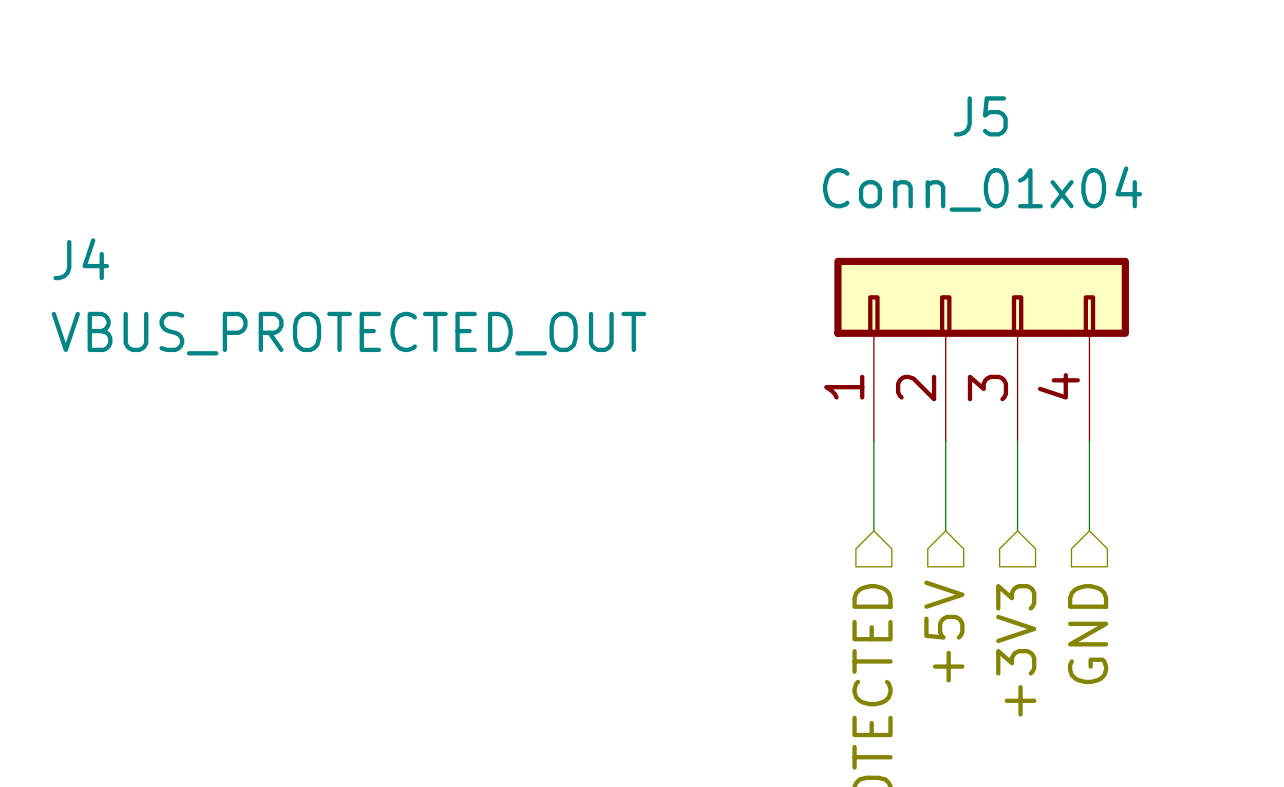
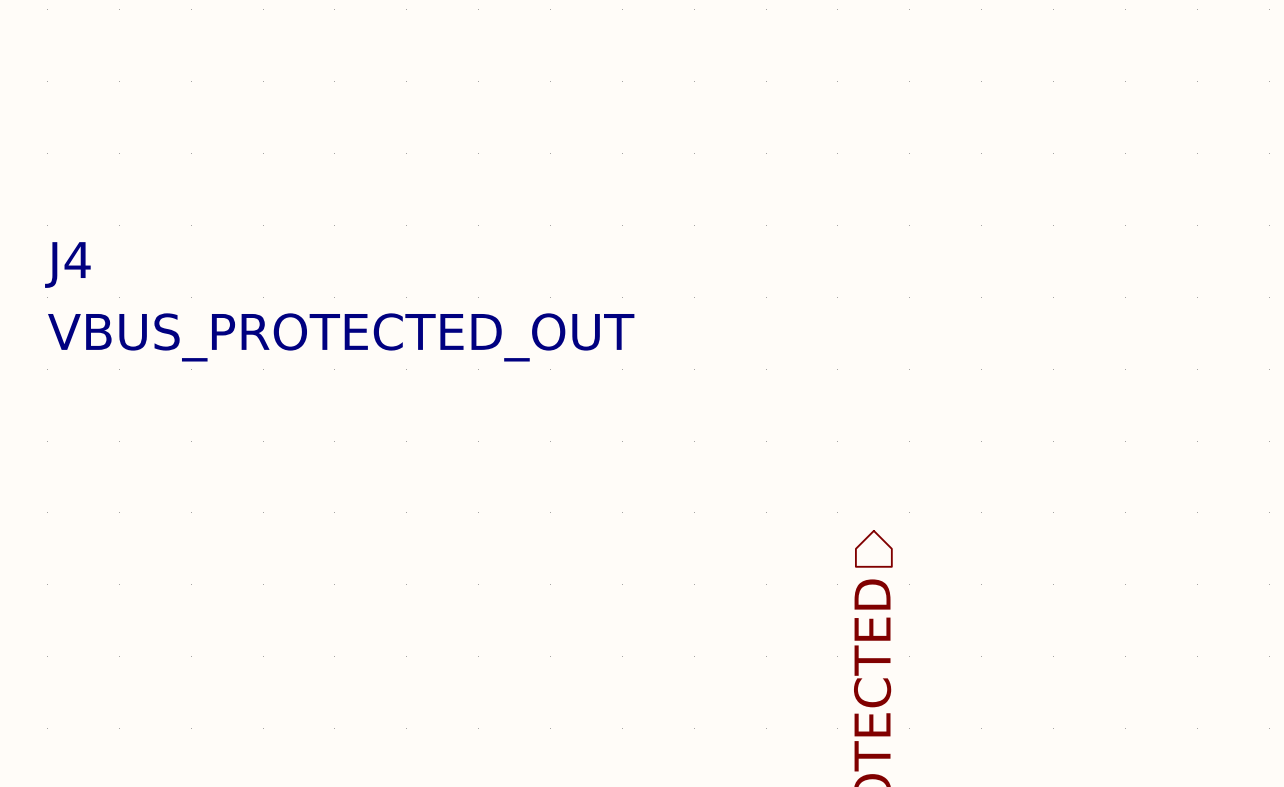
J5: Conn_01x04 (981, 349) -> none
wire: (873, 441) (873, 530) -> none
wire: (945, 441) (945, 530) -> none
wire: (1017, 441) (1017, 530) -> none
wire: (1089, 441) (1089, 530) -> none
hierarchical label: +5V (944, 631) -> none
hierarchical label: GND (1088, 634) -> none
hierarchical label: +3V3 (1016, 650) -> none

